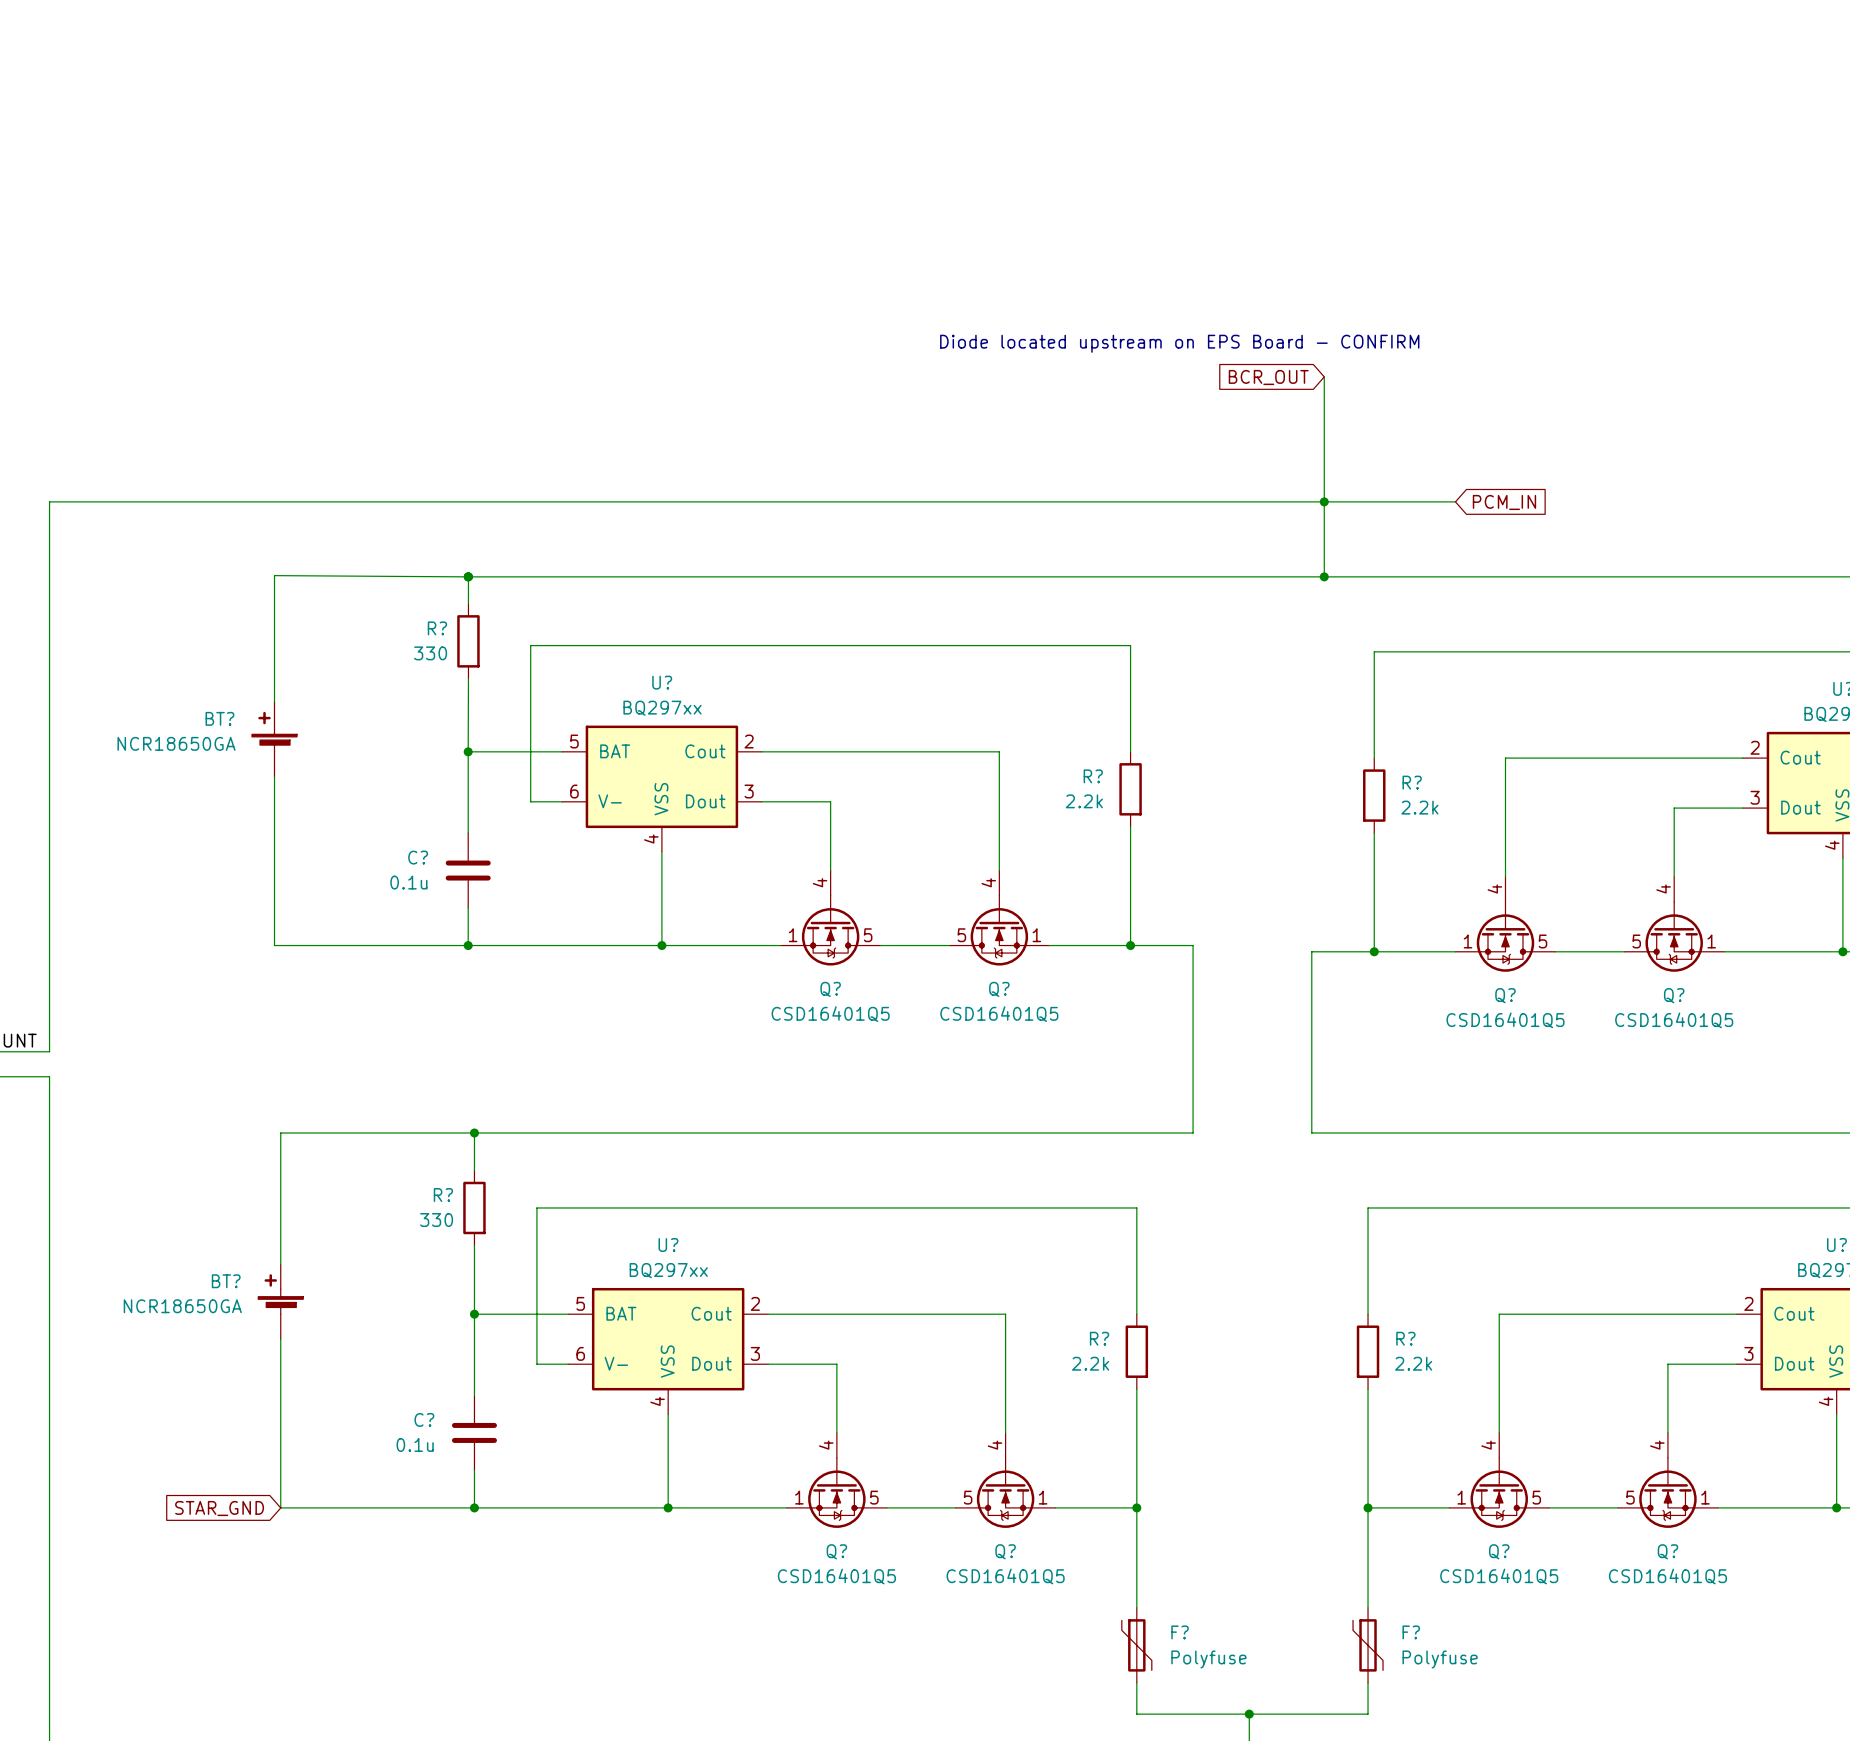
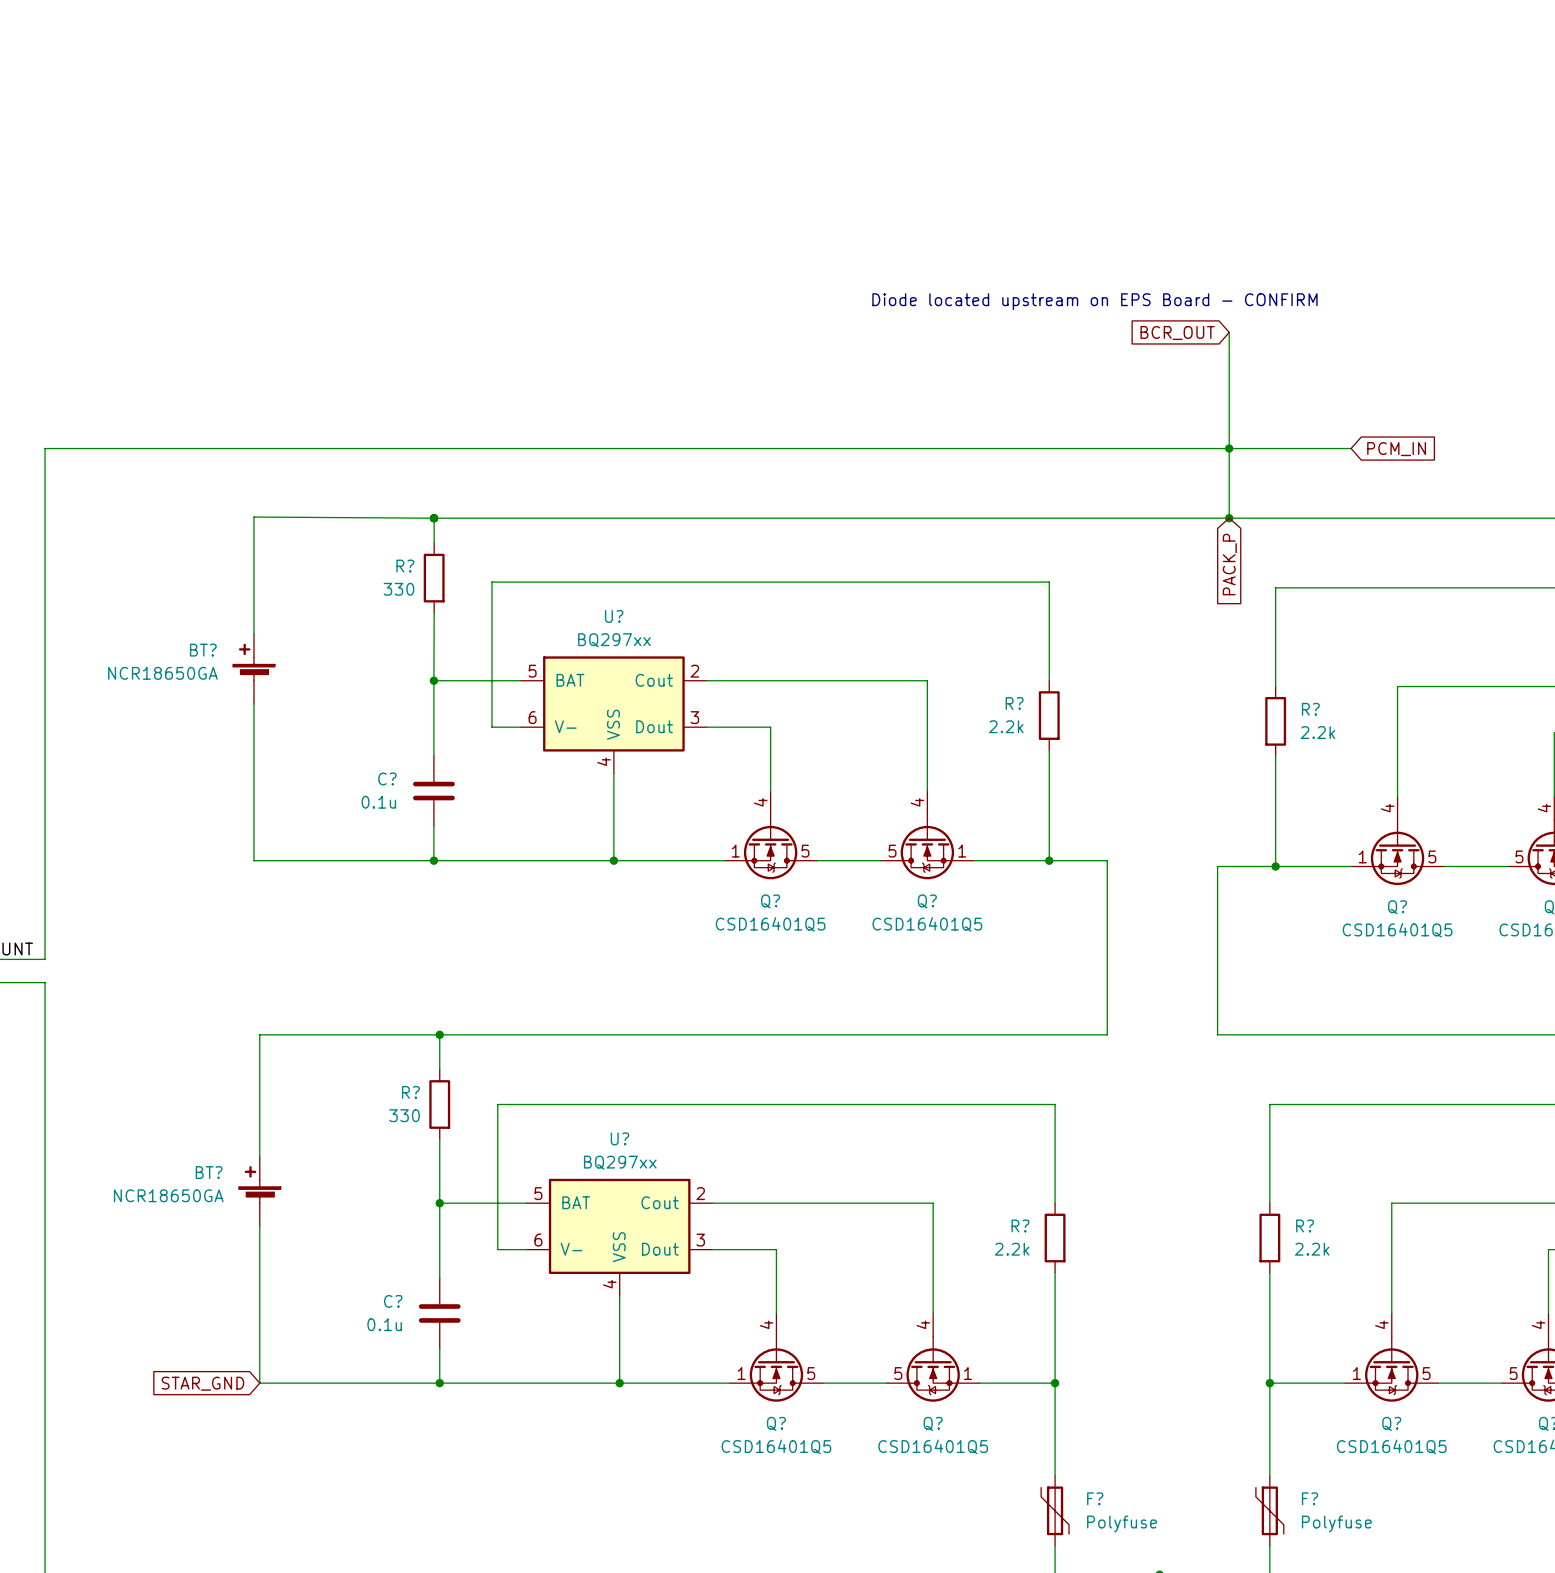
global label: none -> PACK_P (1229, 564)

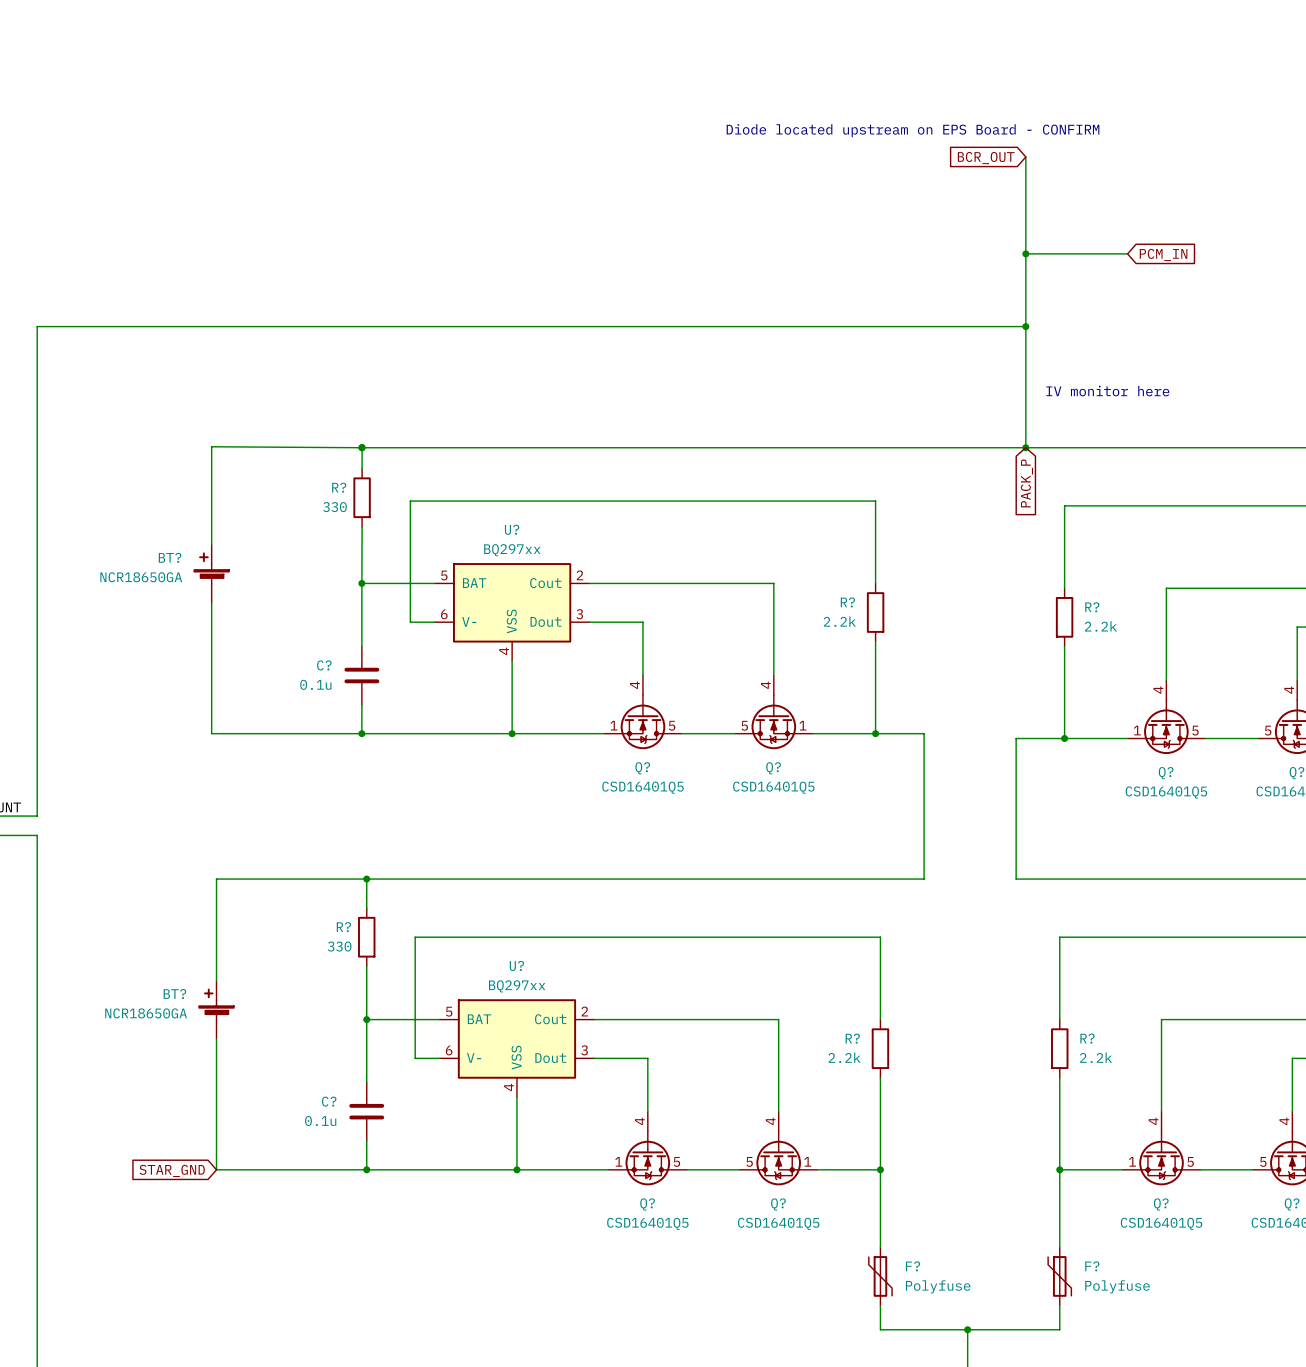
wire: none -> (1025, 156) (1025, 292)
wire: none -> (1025, 253) (1127, 253)
junction: none -> (1025, 253)
text position: Diode located upstream on EPS Board - CONFIRM (1094, 301) -> Diode located upstream on EPS Board - CONFIRM (913, 130)
global label position: BCR_OUT (1177, 332) -> BCR_OUT (986, 158)
junction: none -> (1025, 326)
wire: (45, 448) (1351, 448) -> (37, 389) (37, 326) (1025, 326)
junction: (1229, 448) -> none
global label position: PCM_IN (1396, 449) -> PCM_IN (1163, 254)
text: none -> IV monitor here (1107, 391)

